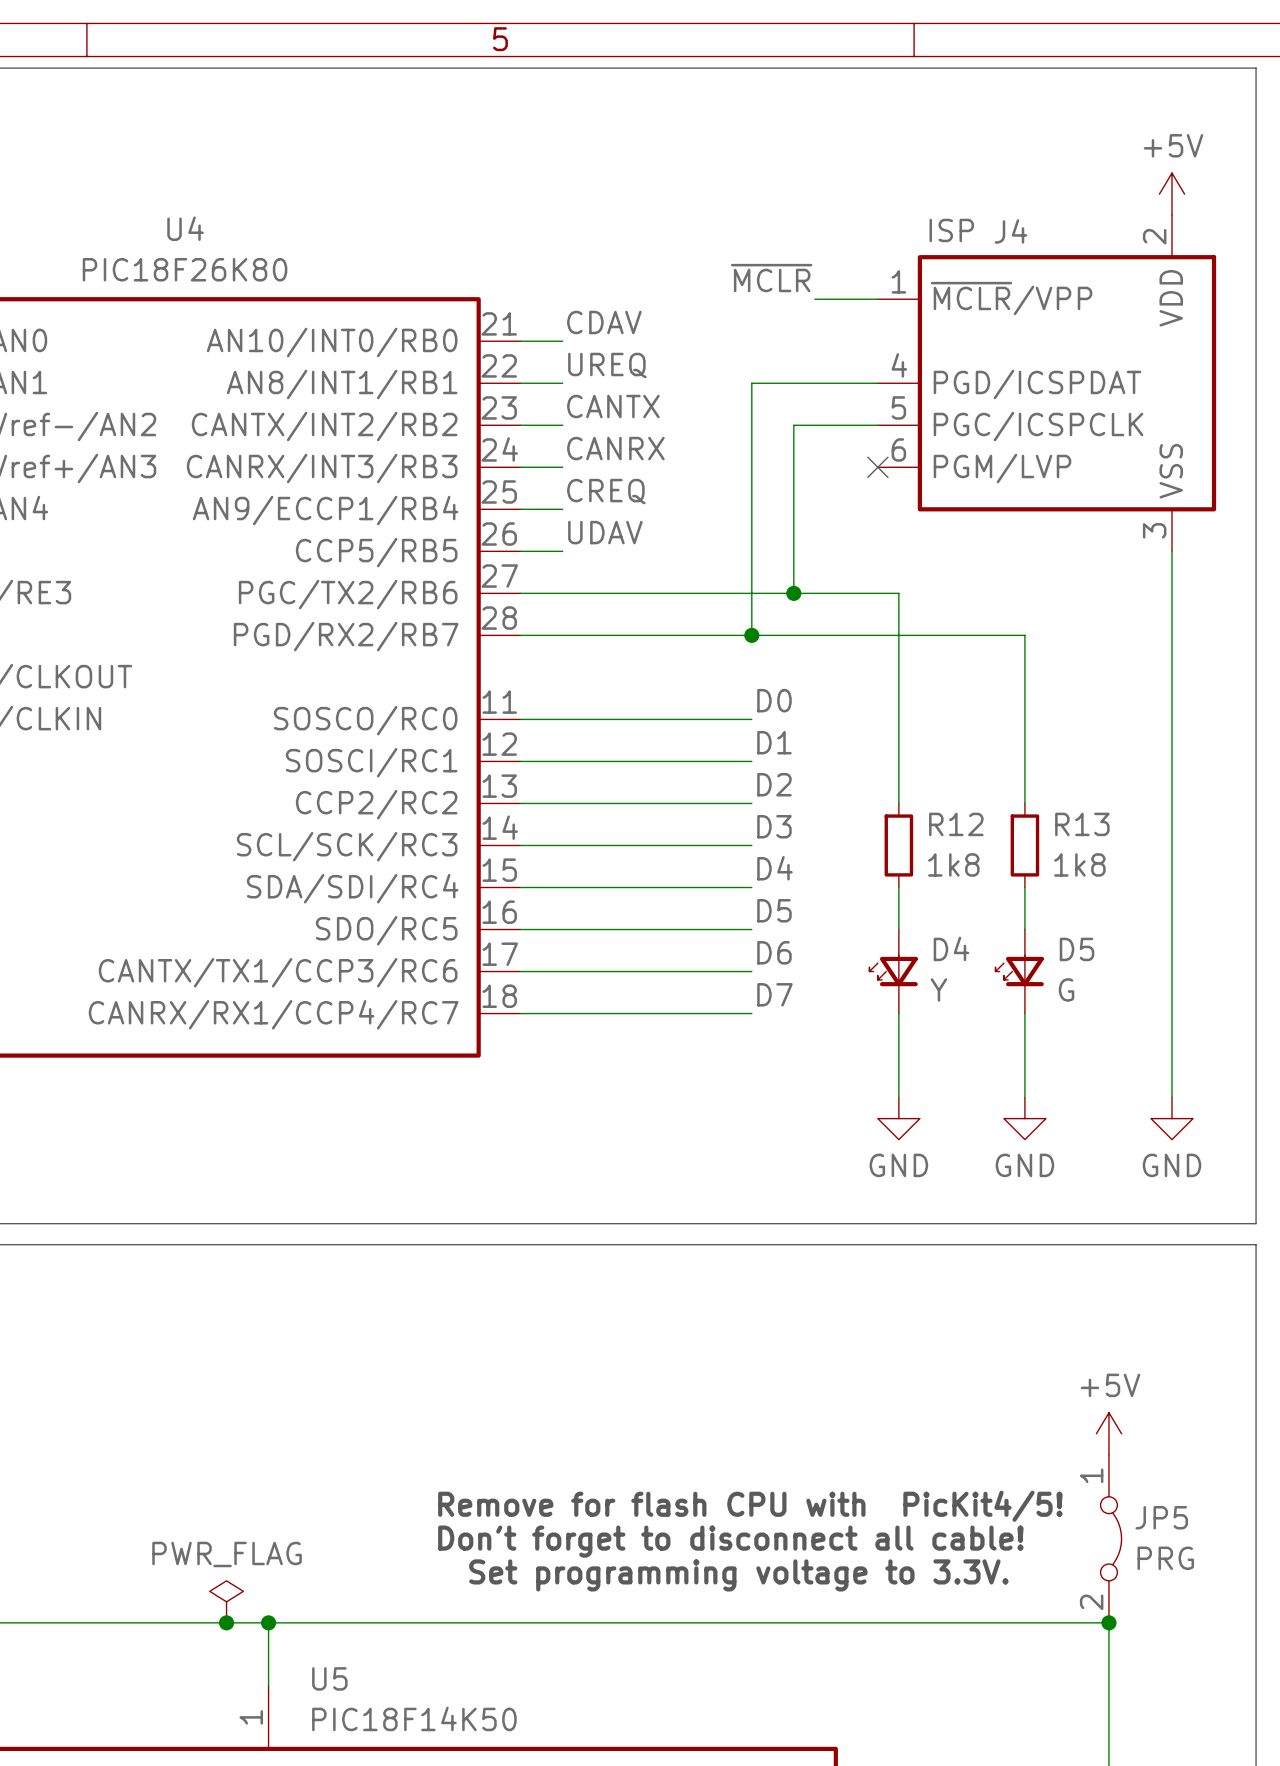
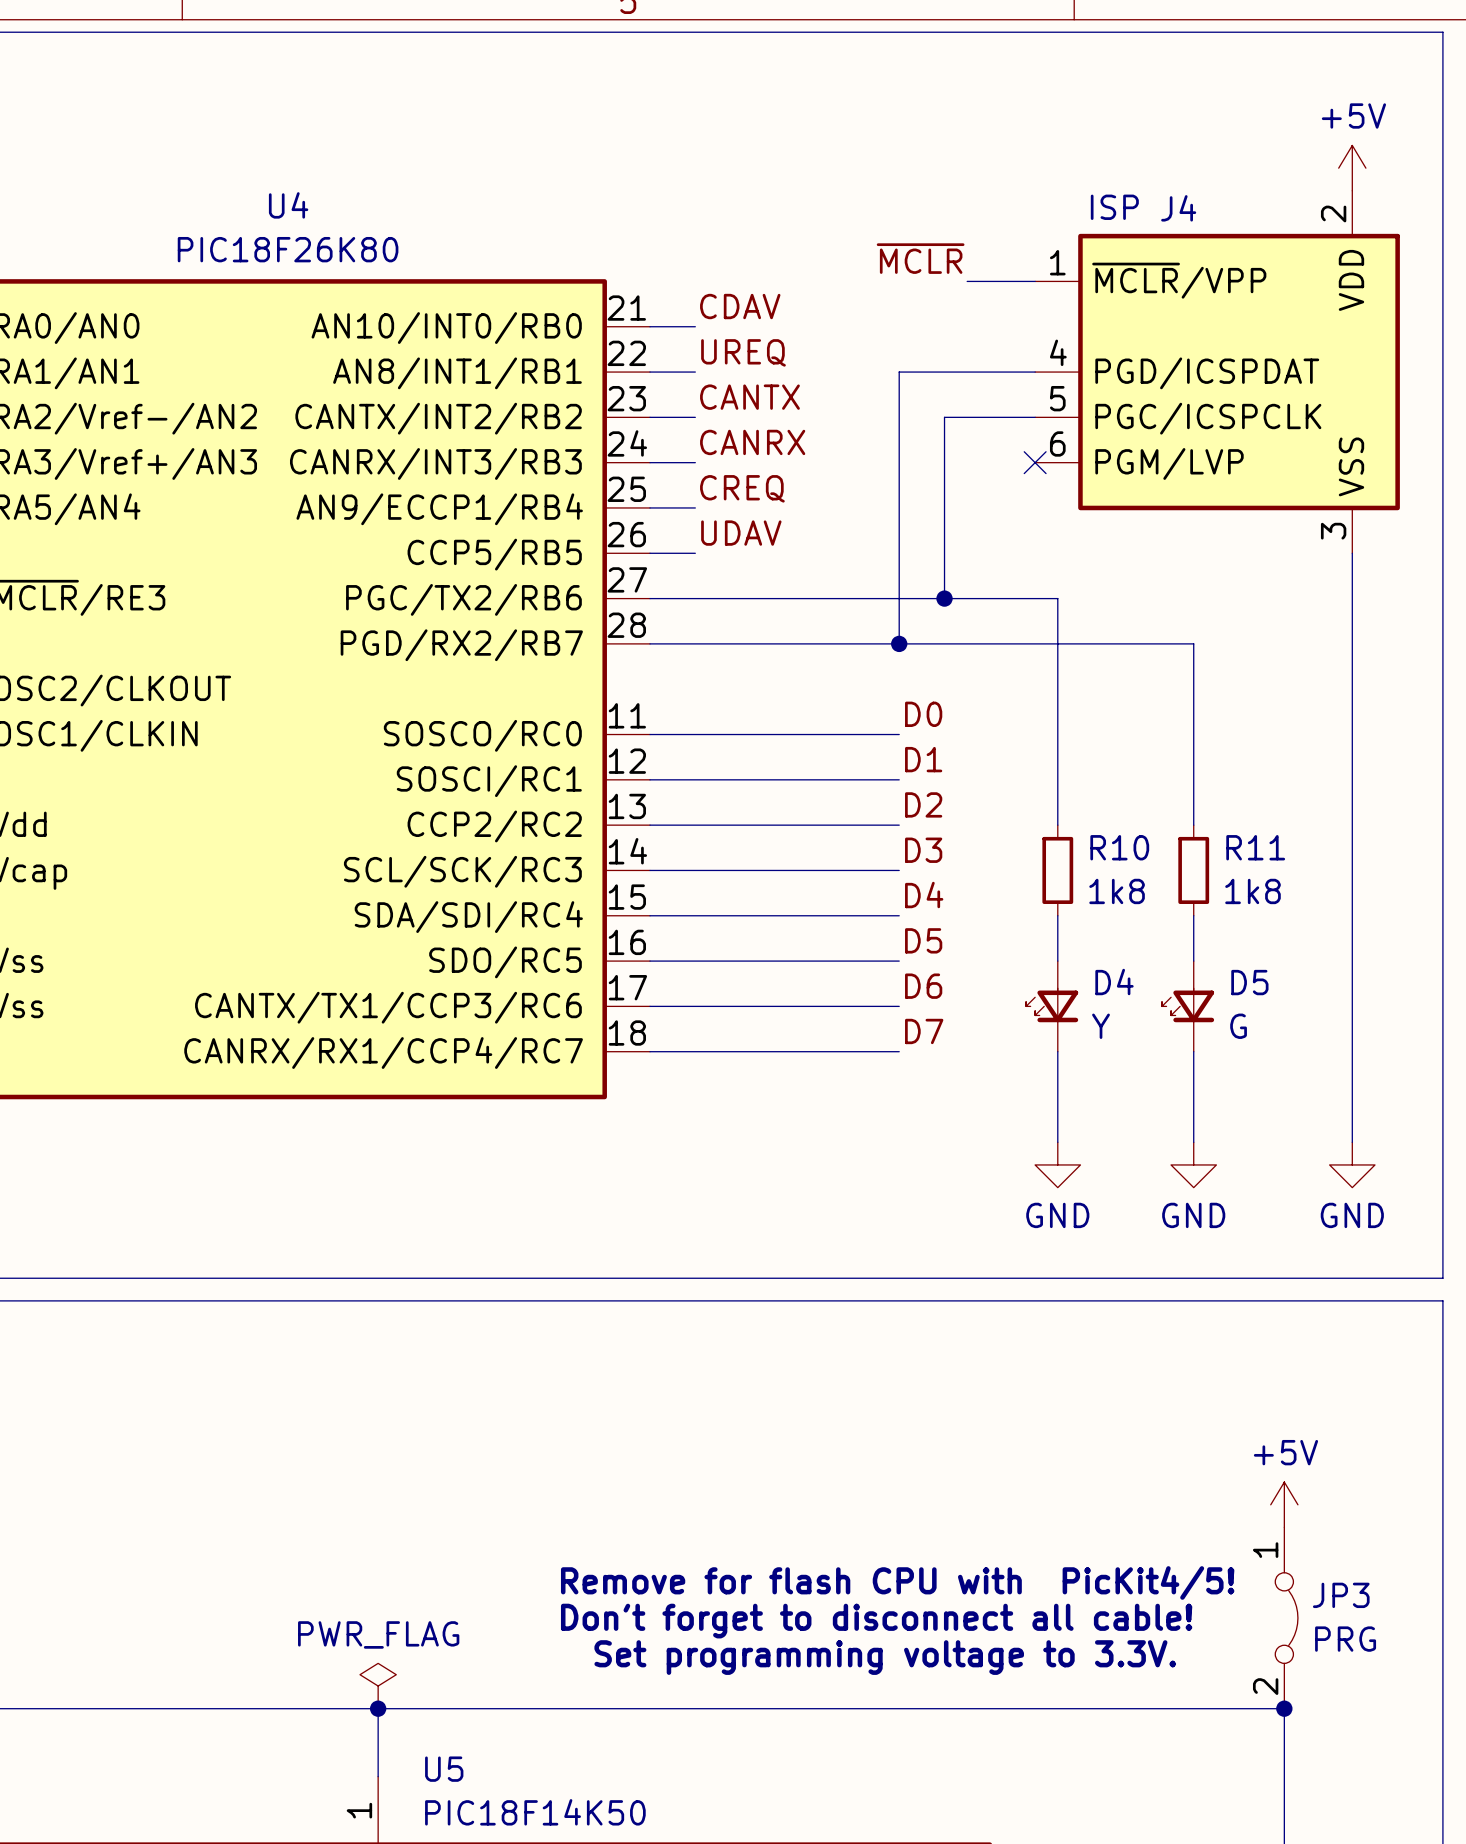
R12 name: R12 (956, 824) -> R10 (1119, 847)
R13 name: R13 (1082, 824) -> R11 (1255, 847)
JP5 name: JP5 (1161, 1517) -> JP3 (1341, 1595)
power symbol position: PWR_FLAG (226, 1601) -> PWR_FLAG (378, 1686)
junction: (226, 1622) -> none

